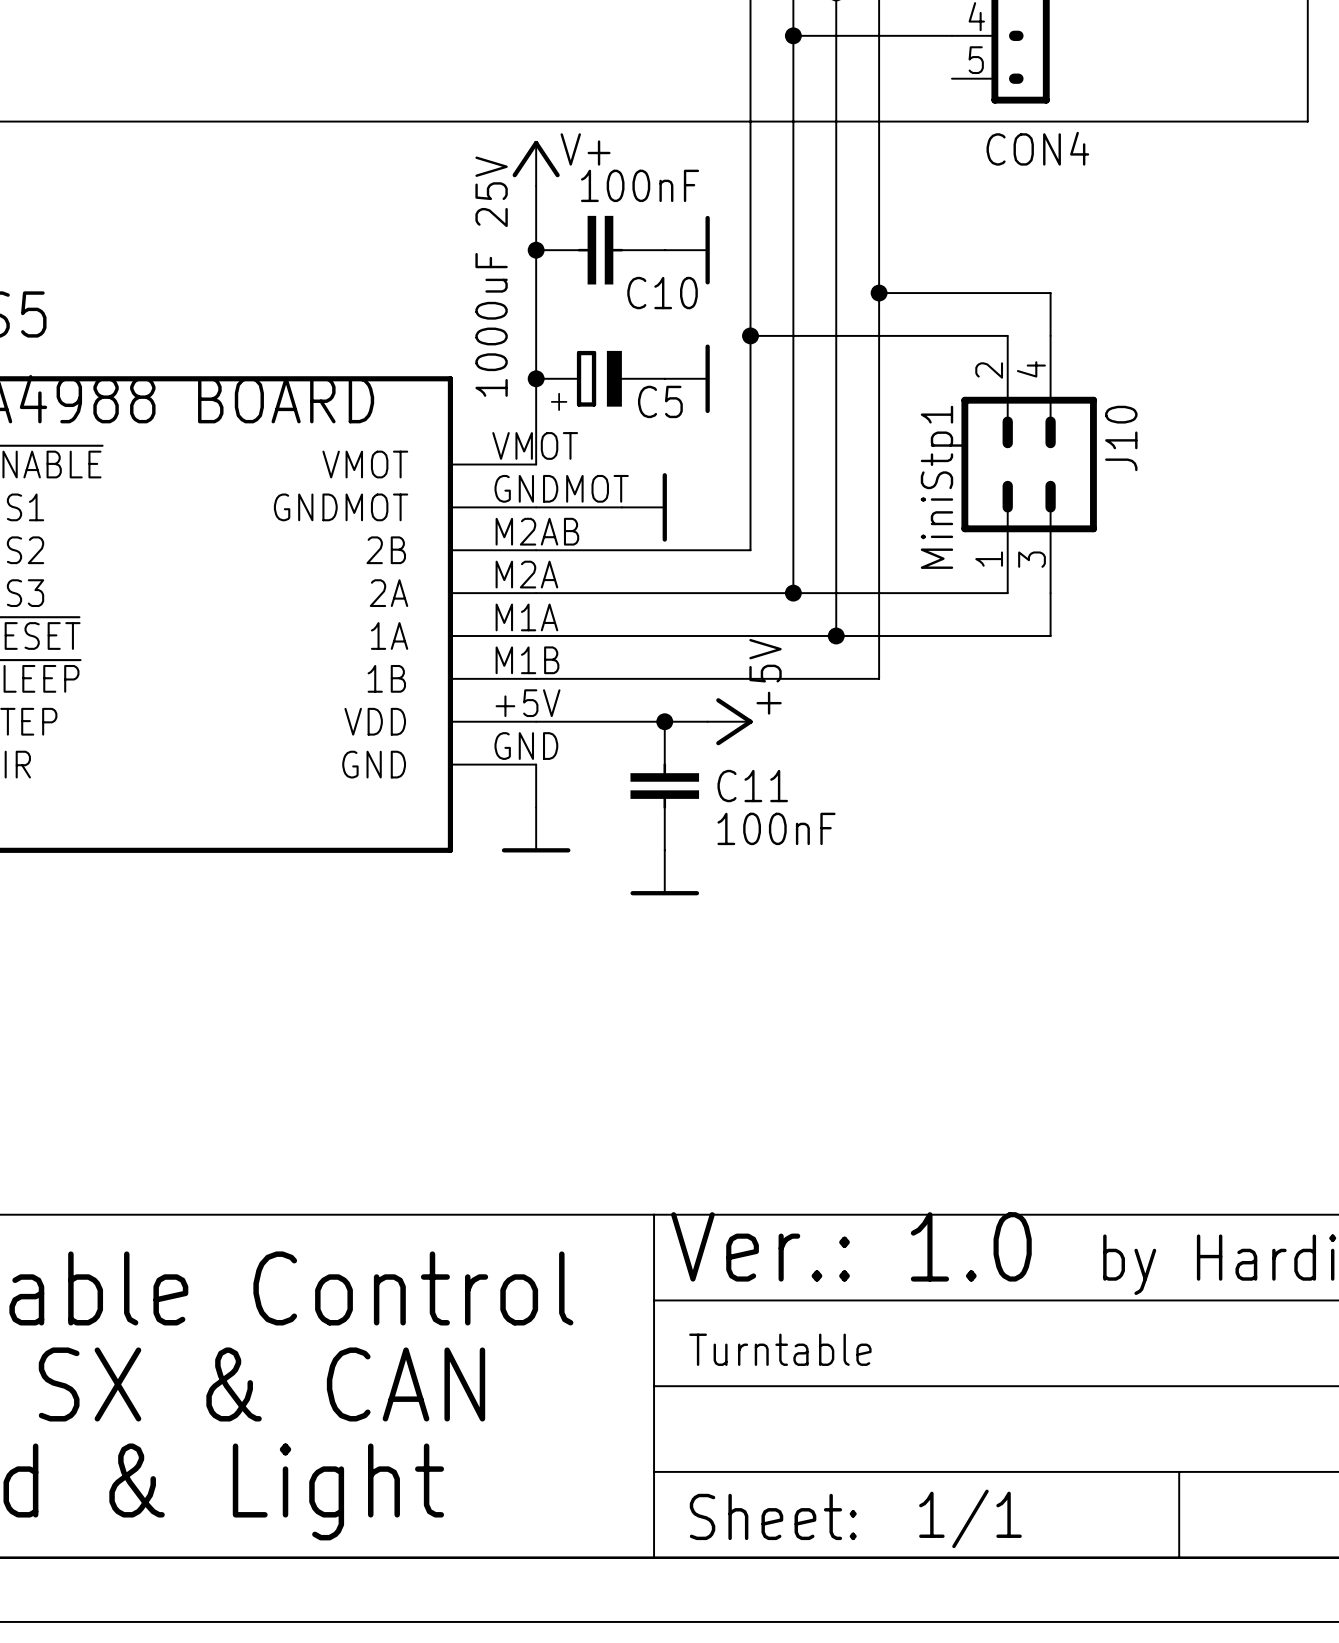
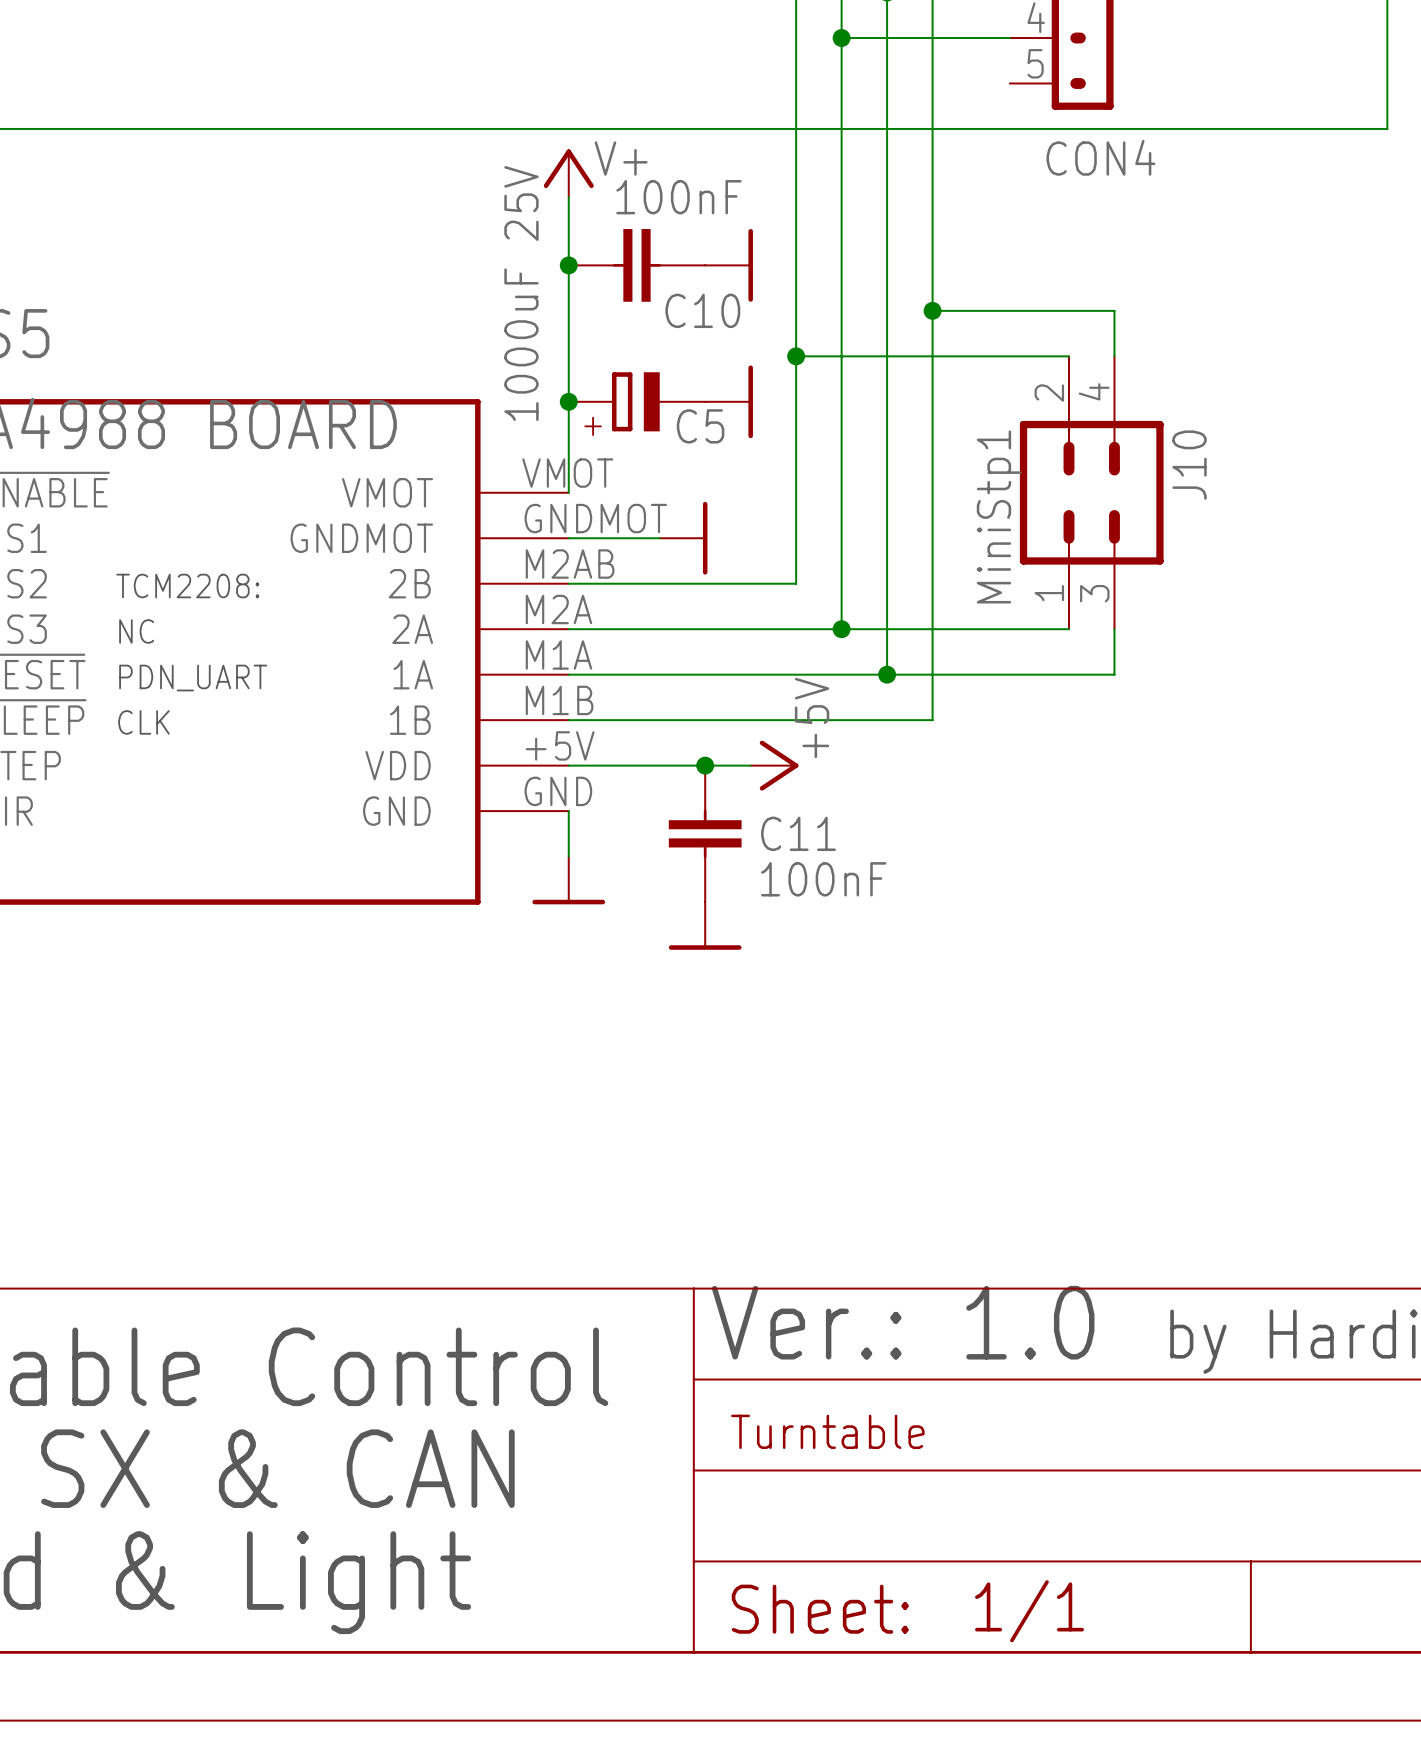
text: none -> TCM2208: (187, 585)
text: none -> NC (136, 631)
text: none -> PDN_UART (193, 678)
text: none -> CLK (143, 722)

